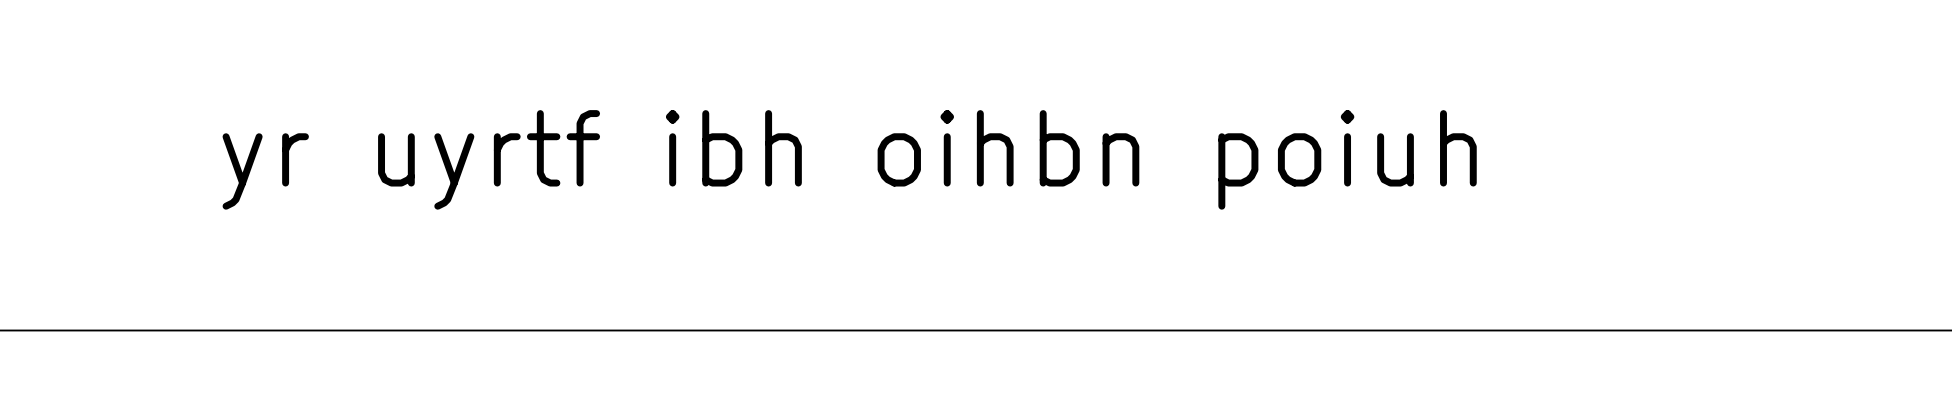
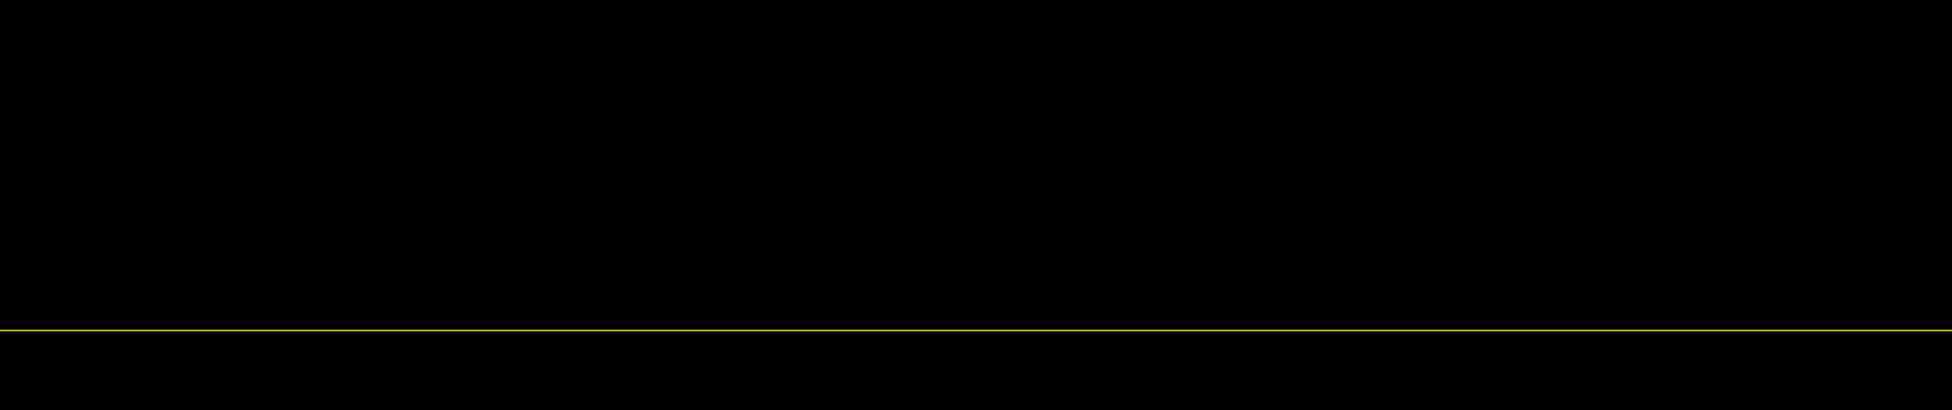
text: yr uyrtf ibh oihbn poiuh (849, 159) -> none

